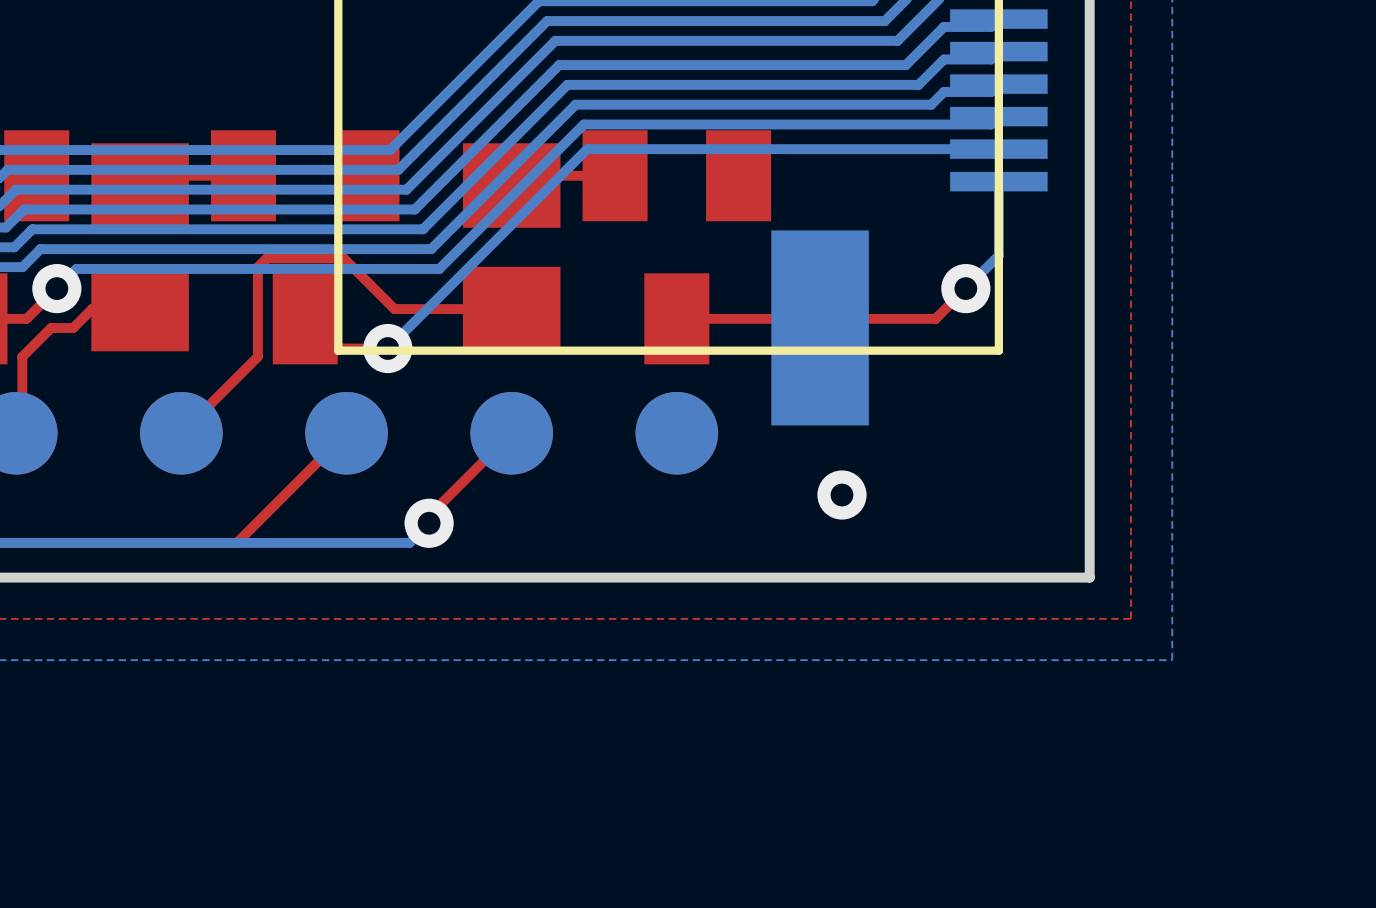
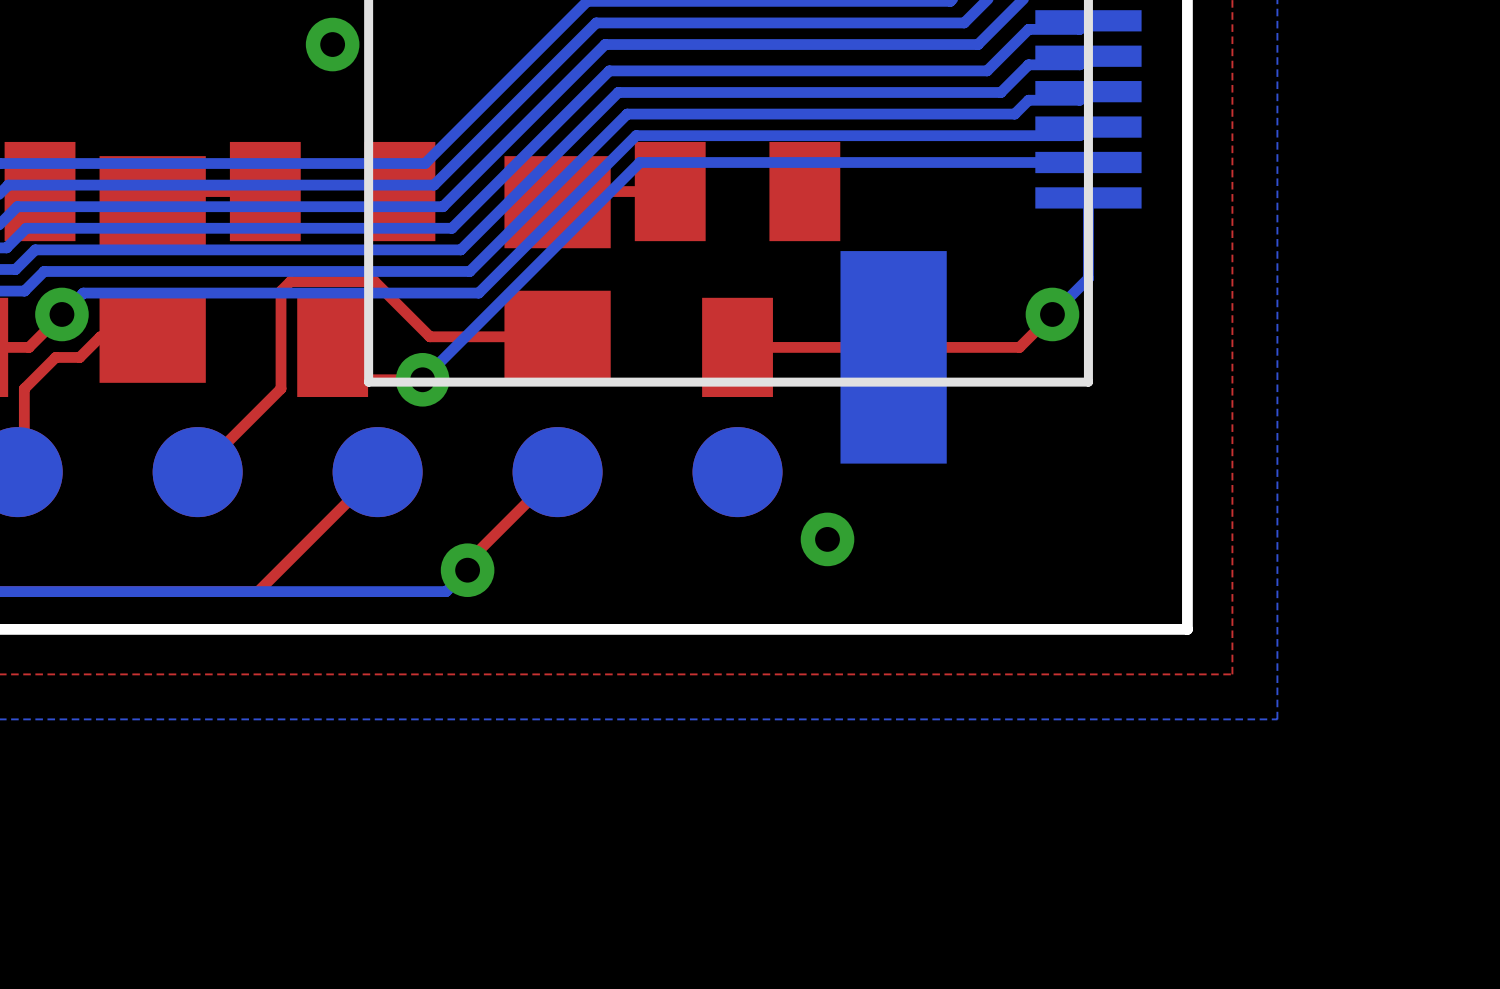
via: none -> (332, 44)
via position: (841, 495) -> (827, 539)

